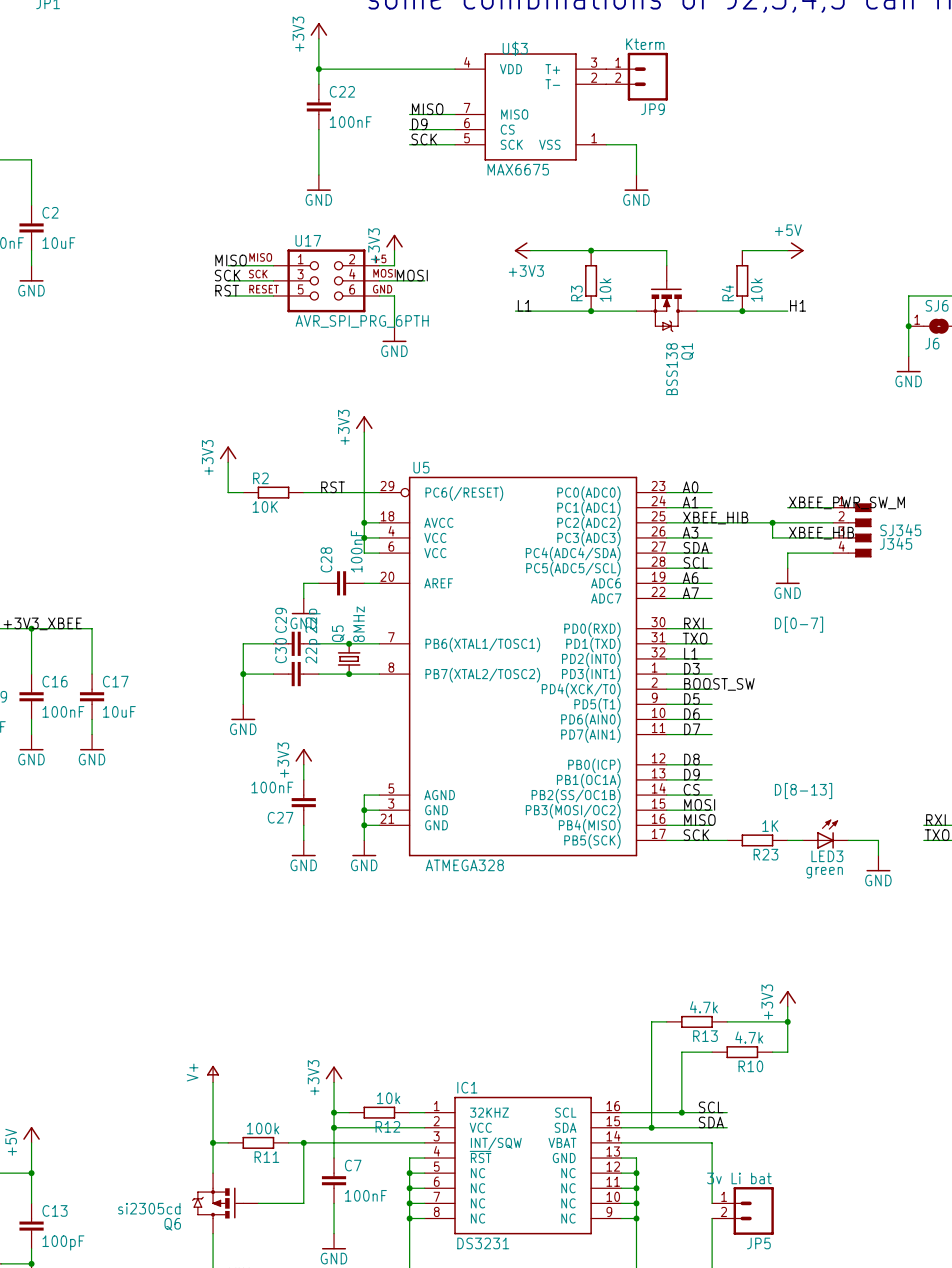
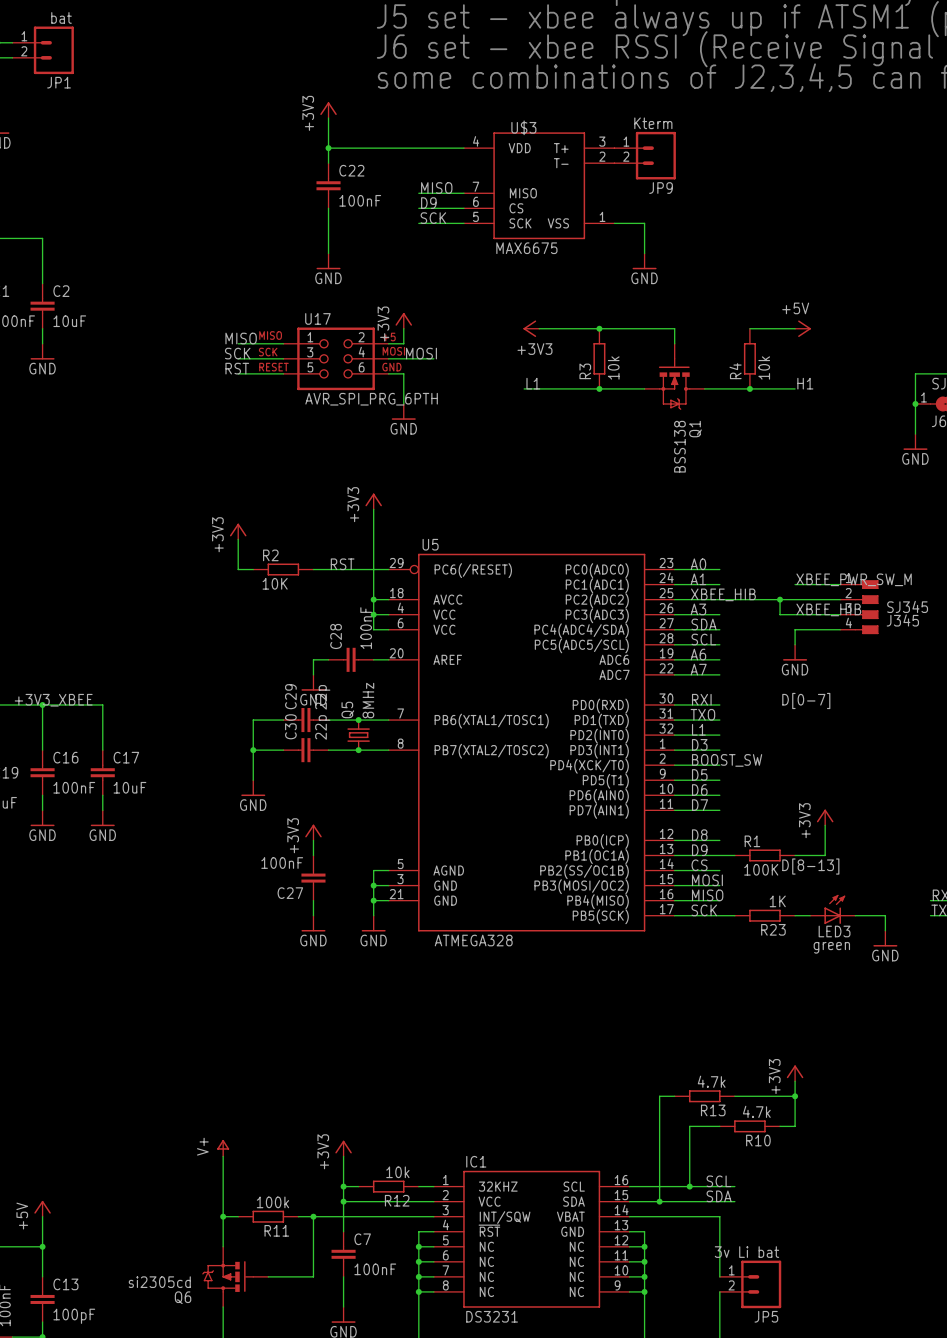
power symbol: none -> +3V3 (825, 817)
wire: none -> (825, 825) (825, 855) (795, 855)
wire: none -> (719, 855) (734, 855)
R1: none -> 100K (764, 855)

